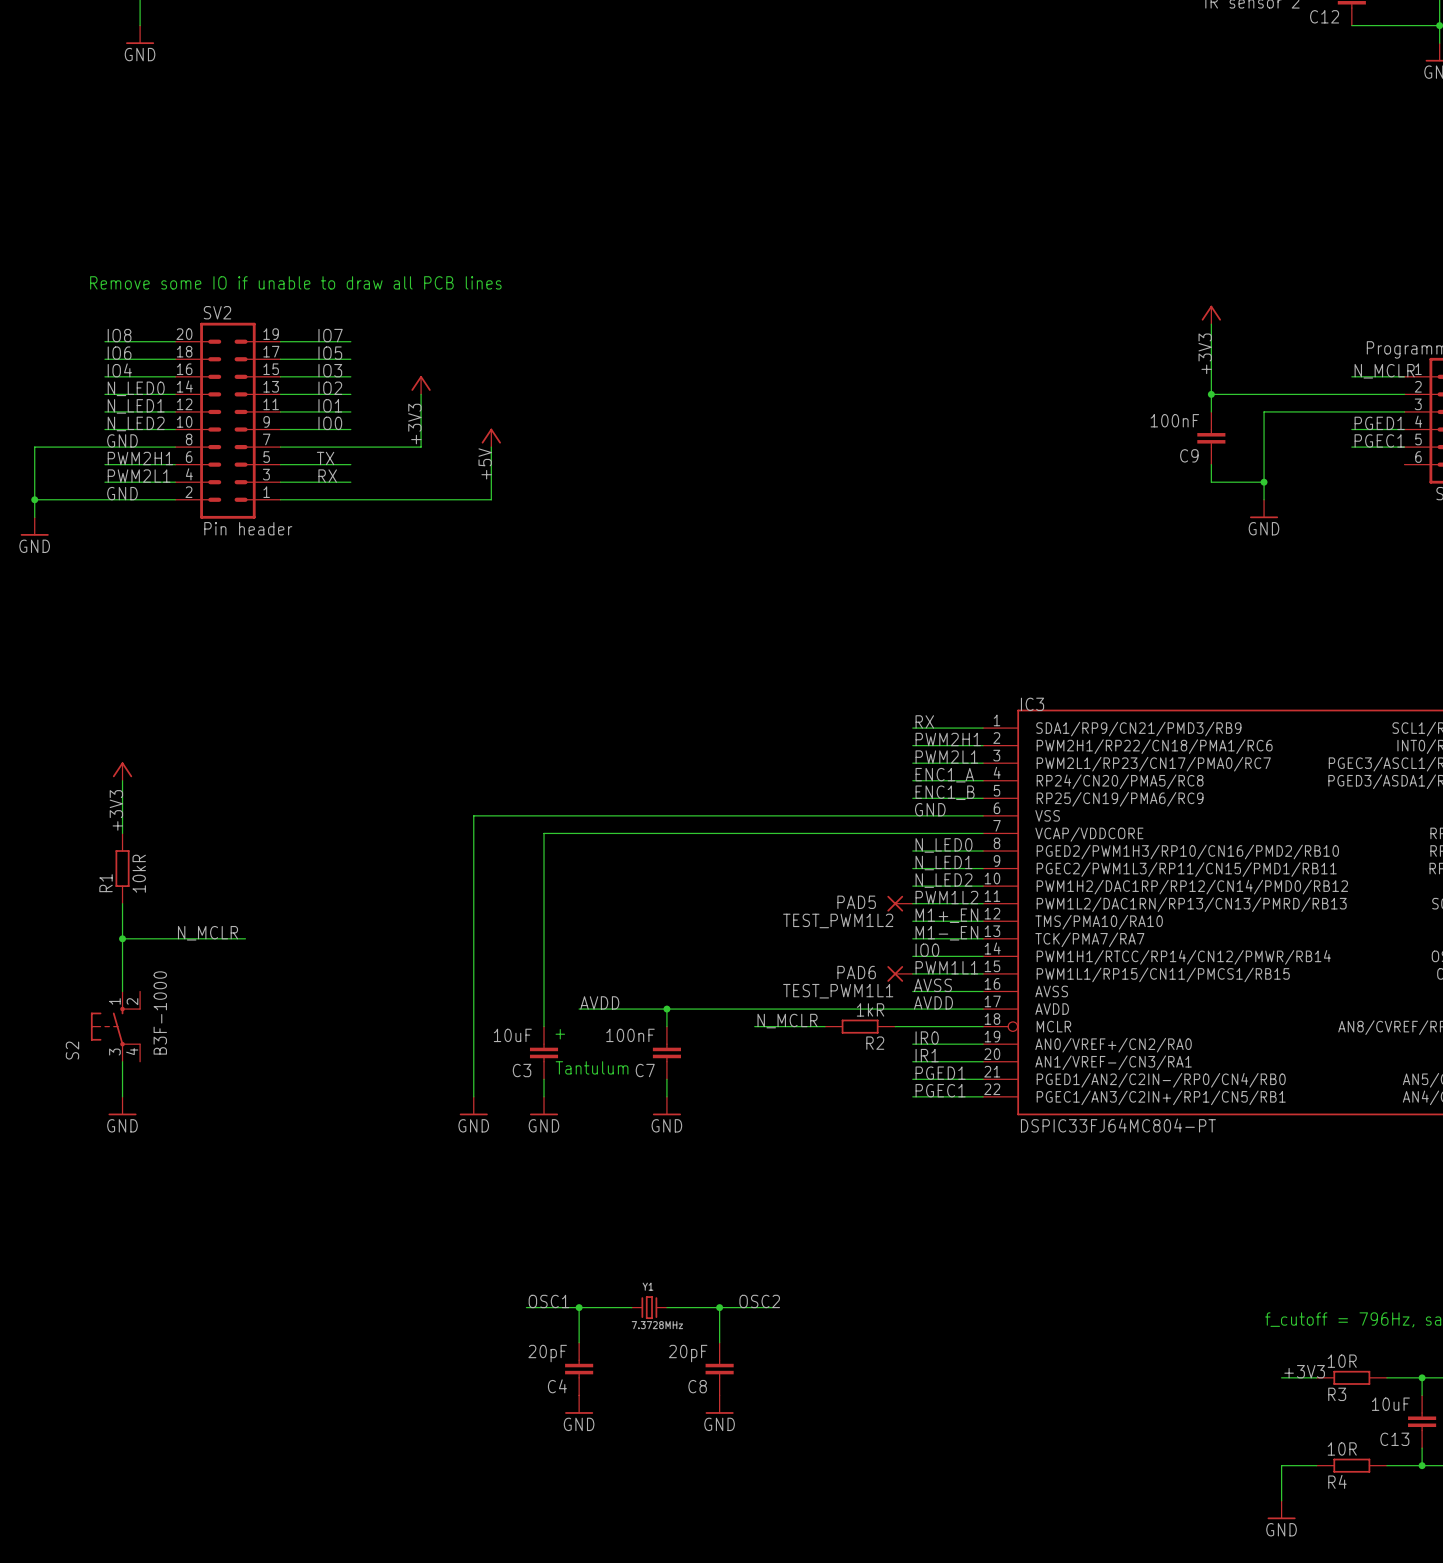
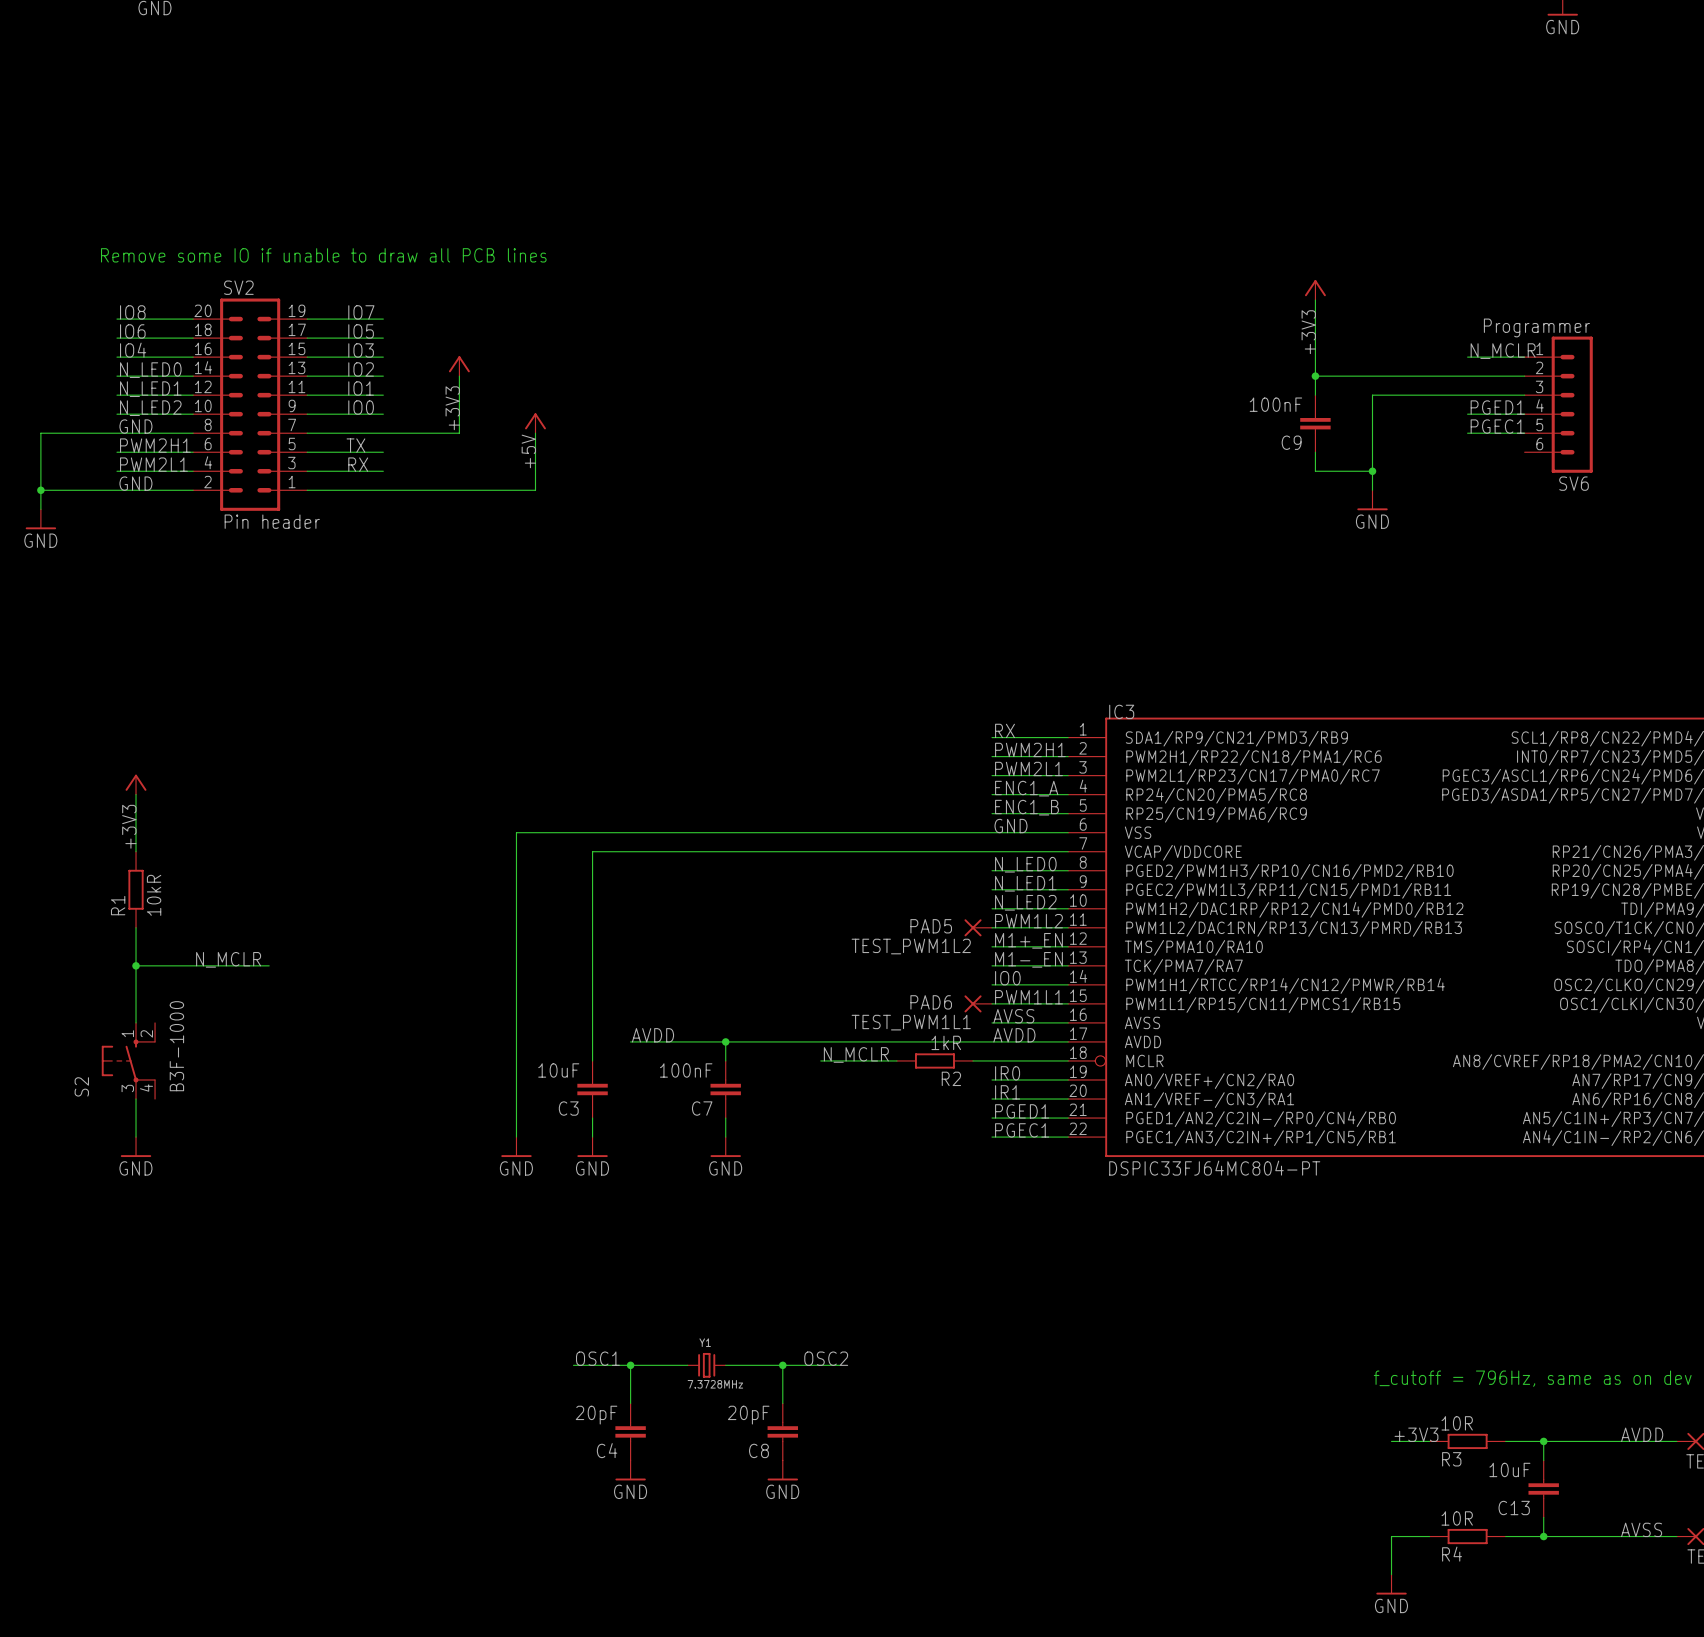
text: + (560, 1034) -> none
text: Tantulum (592, 1067) -> none

